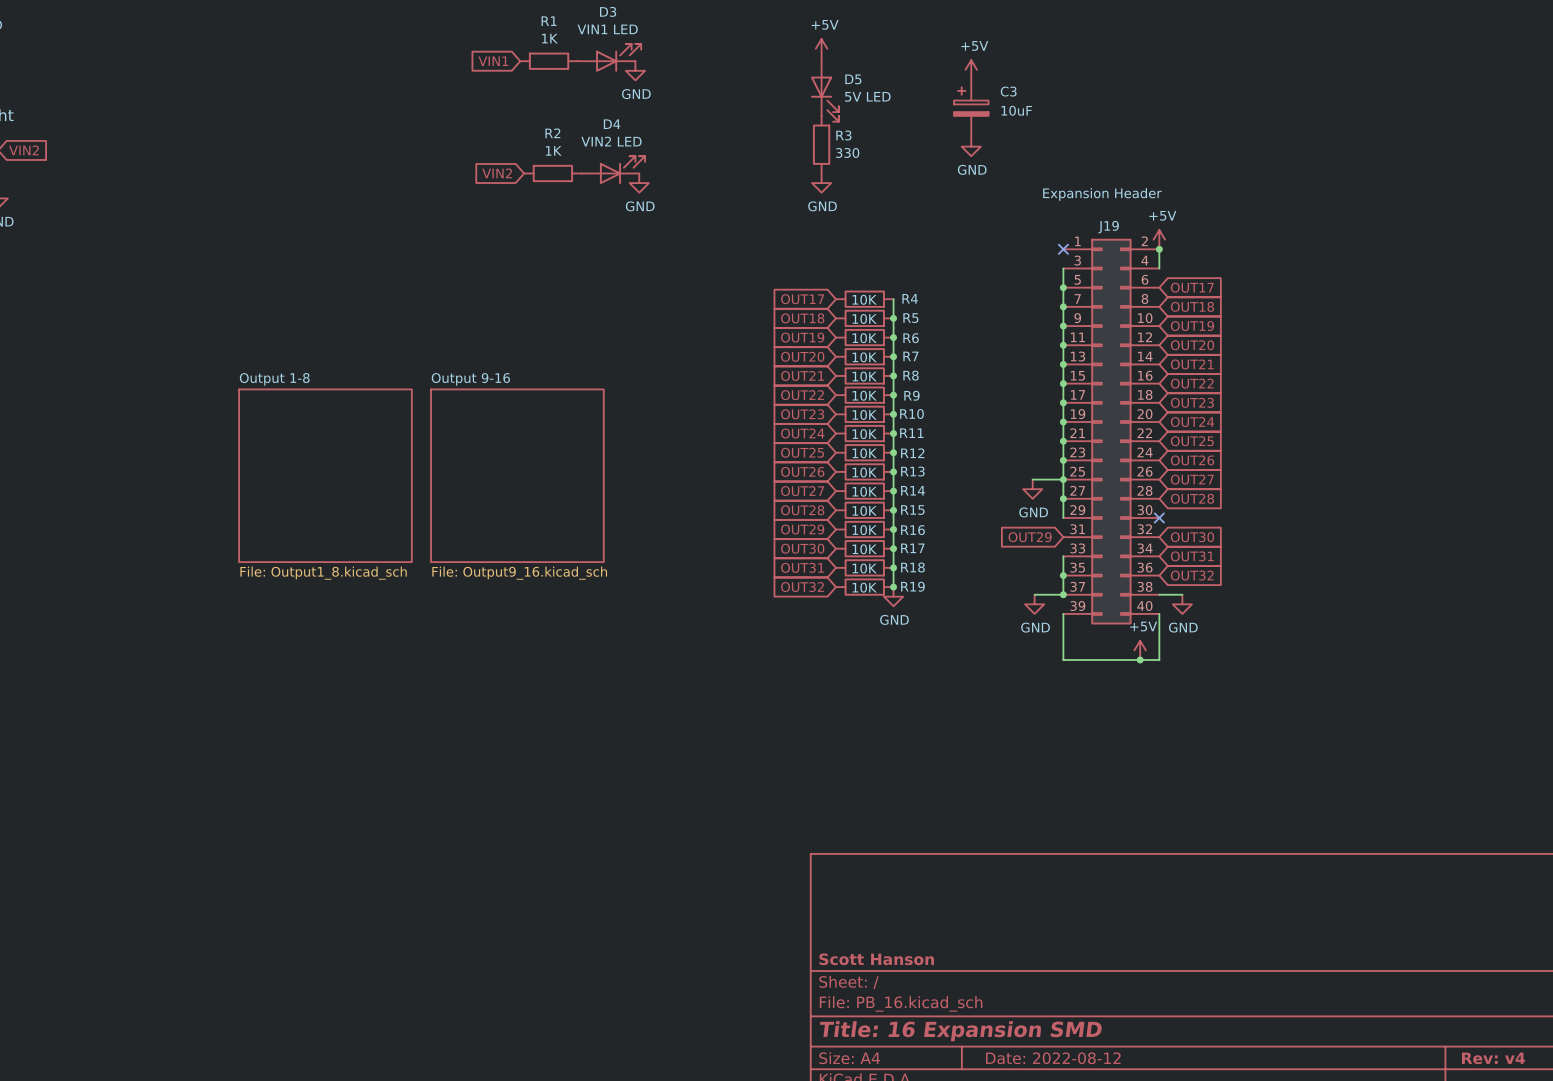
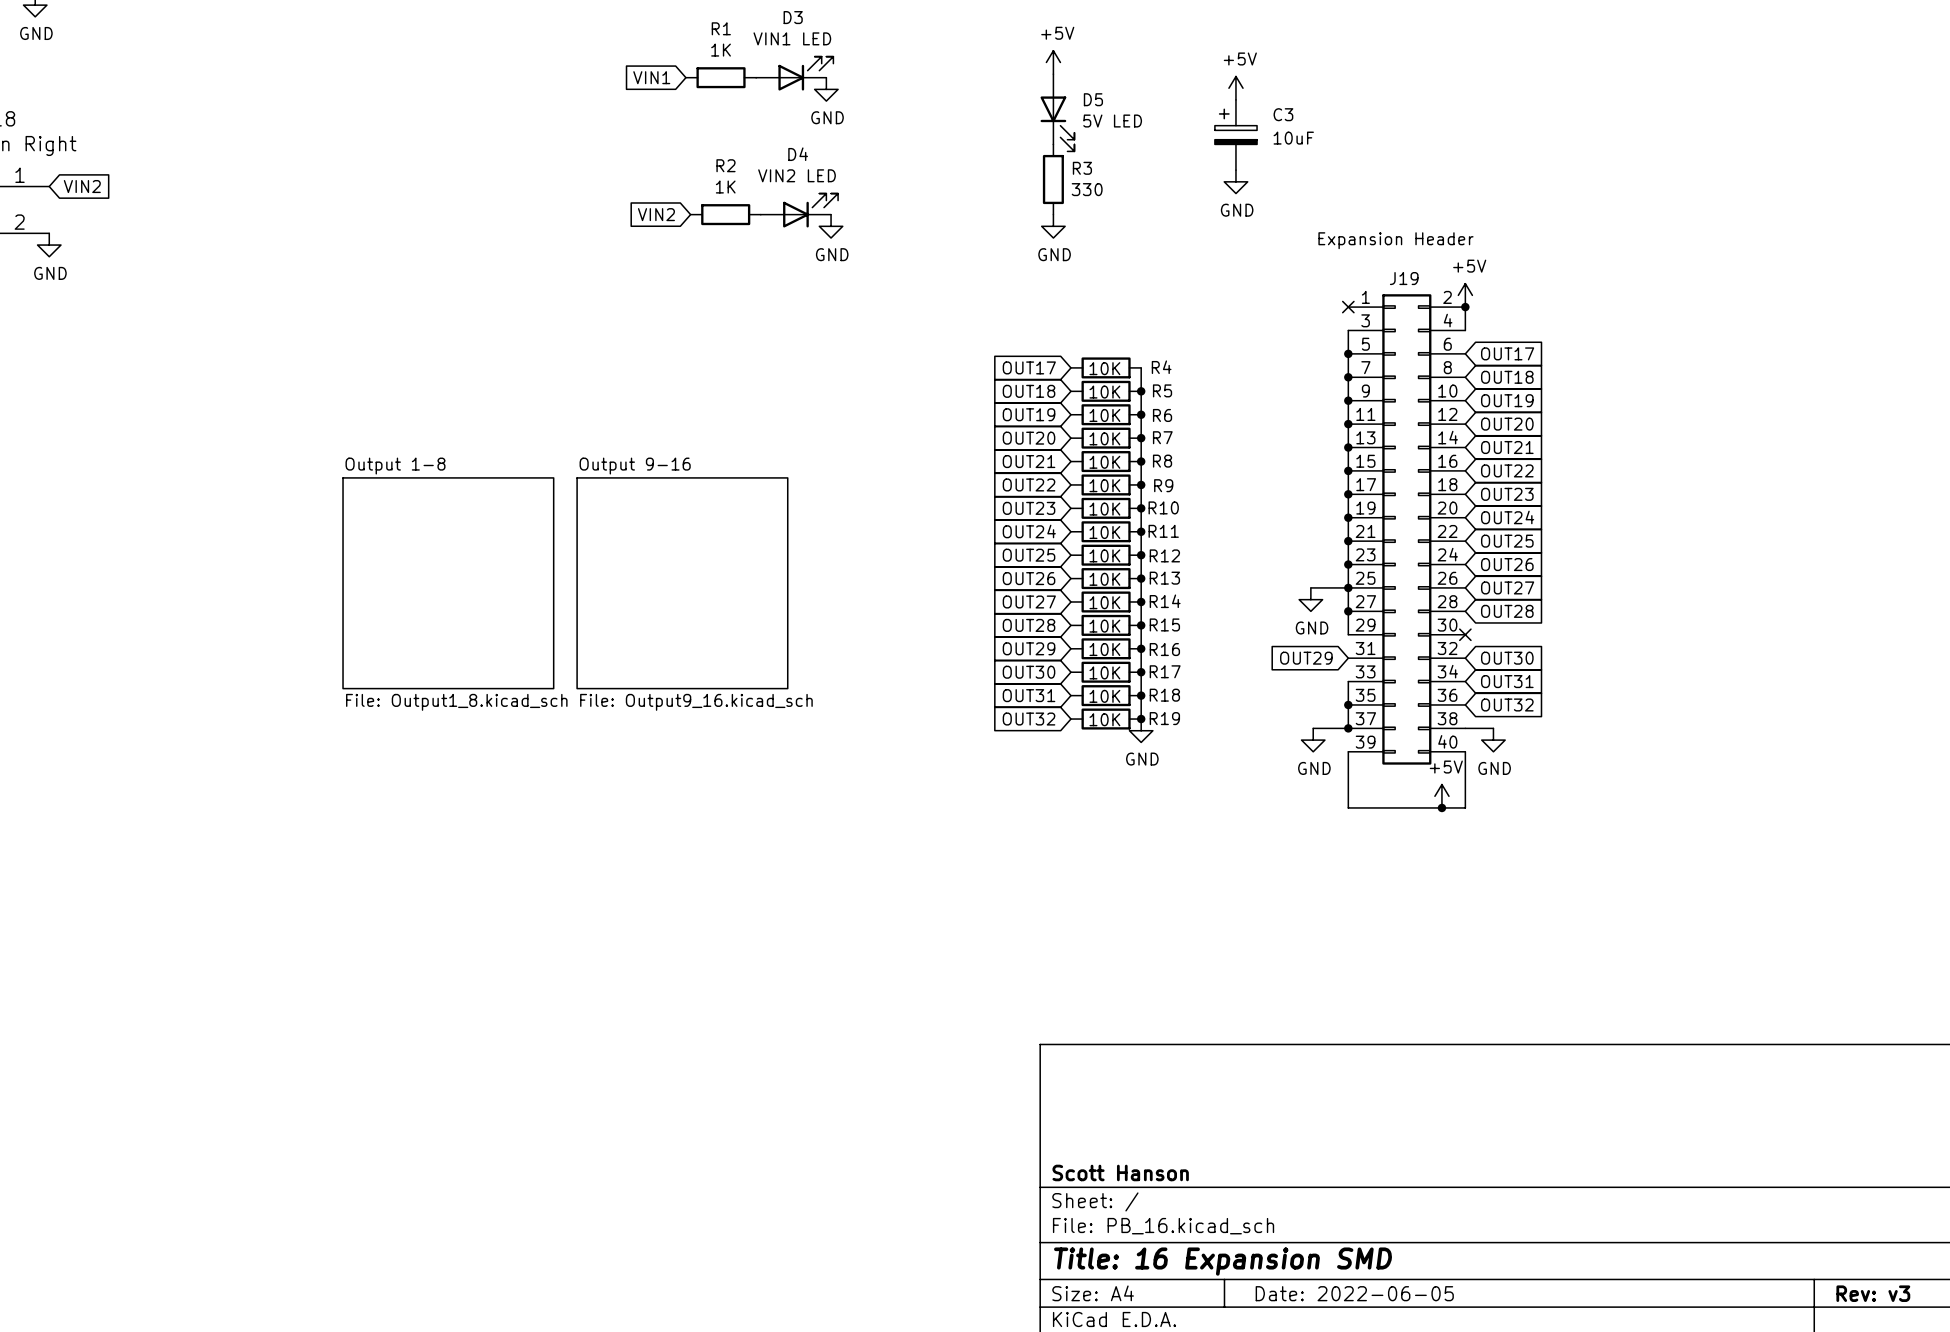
title block: Date: 2022-08-12 (1053, 1058) -> Date: 2022-06-05 (1354, 1293)
title block: Rev: v4 (1493, 1058) -> Rev: v3 (1873, 1293)

